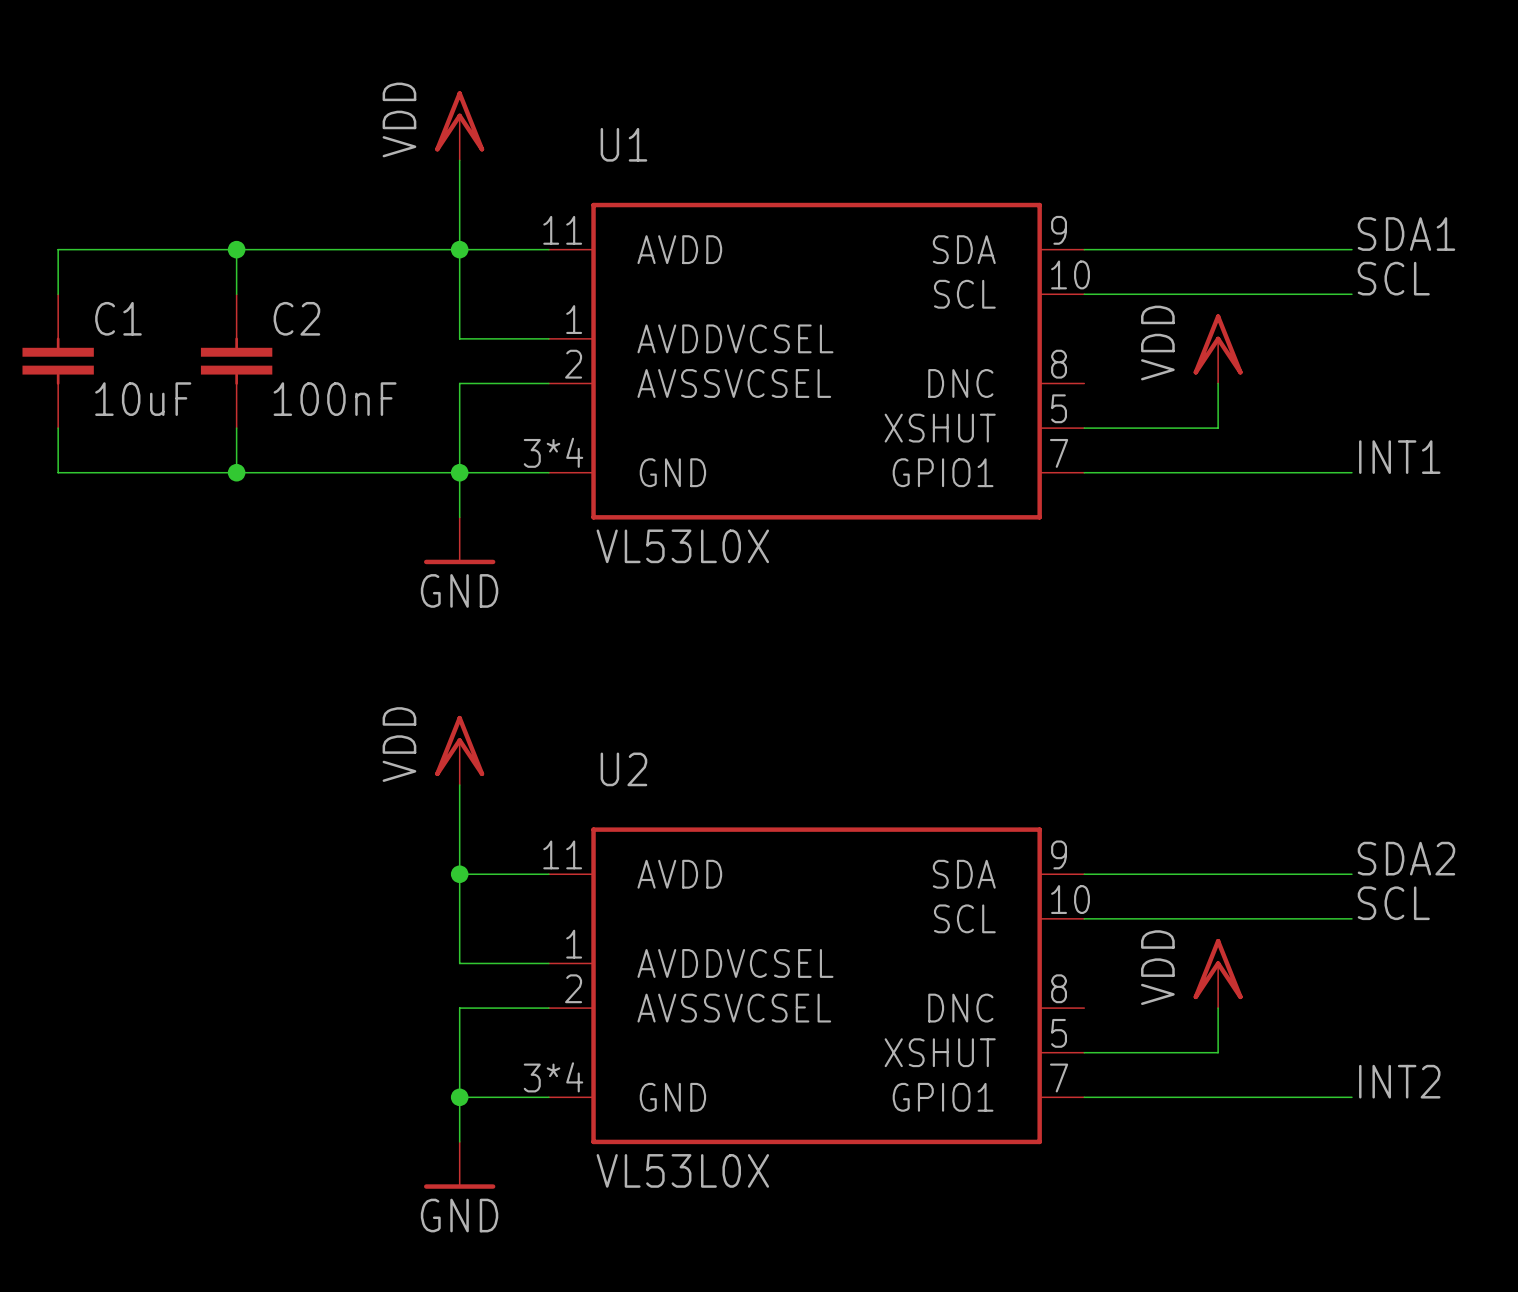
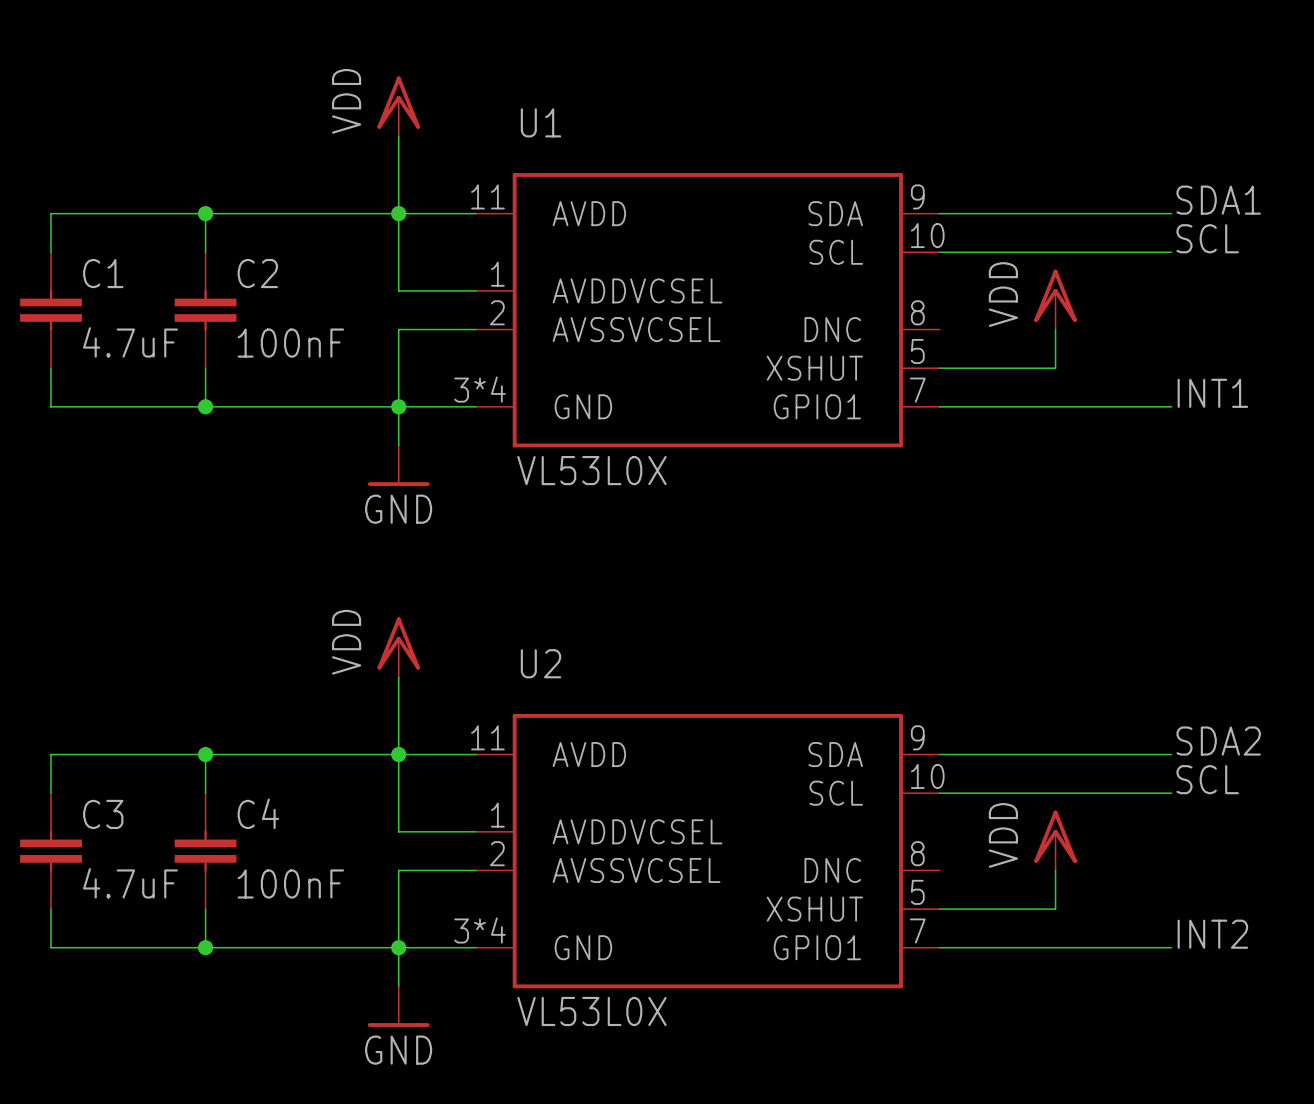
C1 value: 10uF (143, 399) -> 4.7uF (130, 342)
wire: none -> (205, 754) (205, 793)
junction: none -> (205, 754)
wire: none -> (398, 754) (51, 754) (51, 793)
C3: none -> 4.7uF (51, 851)
C4: none -> 100nF (205, 851)
wire: none -> (51, 909) (51, 947) (398, 947)
wire: none -> (205, 909) (205, 947)
junction: none -> (205, 947)

